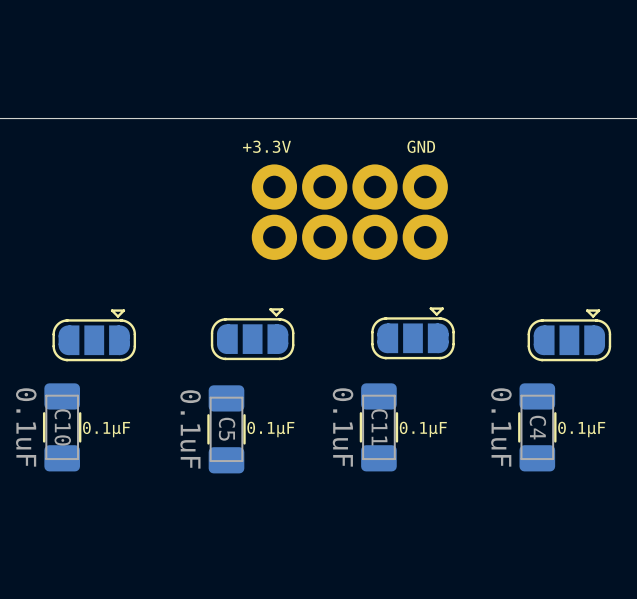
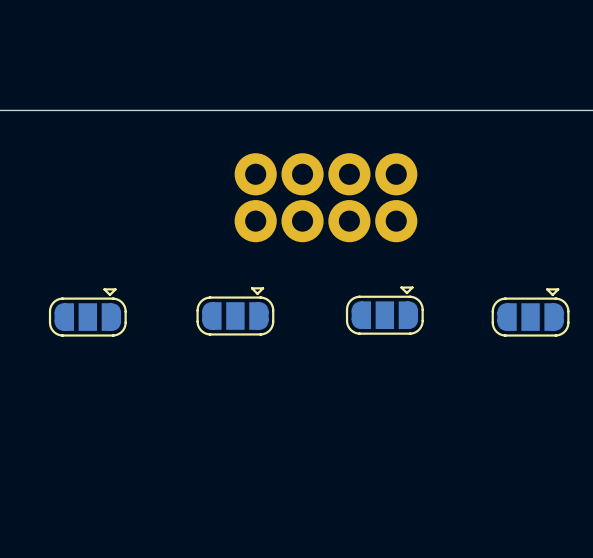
text: +3.3V (266, 146) -> none
text: GND (421, 146) -> none
C10: 0.1uF (62, 427) -> none
C11: 0.1uF (378, 427) -> none
C4: 0.1uF (537, 427) -> none
text: 0.1µF (106, 429) -> none
C5: 0.1uF (226, 429) -> none
text: 0.1µF (270, 429) -> none
text: 0.1µF (423, 429) -> none
text: 0.1µF (581, 429) -> none

